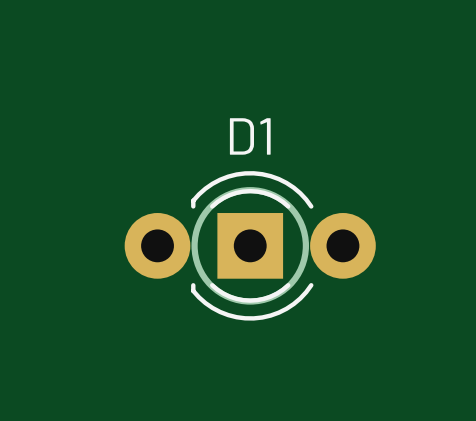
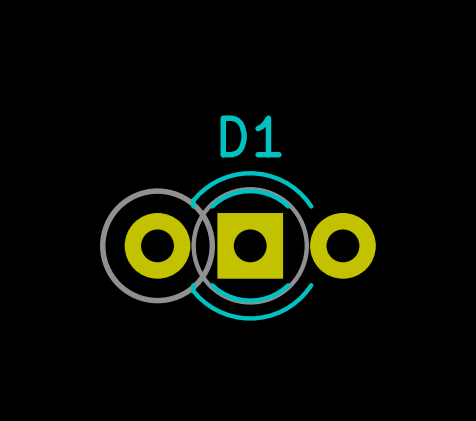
D1 footprint: [124, 171, 376, 321] -> [100, 171, 376, 321]

